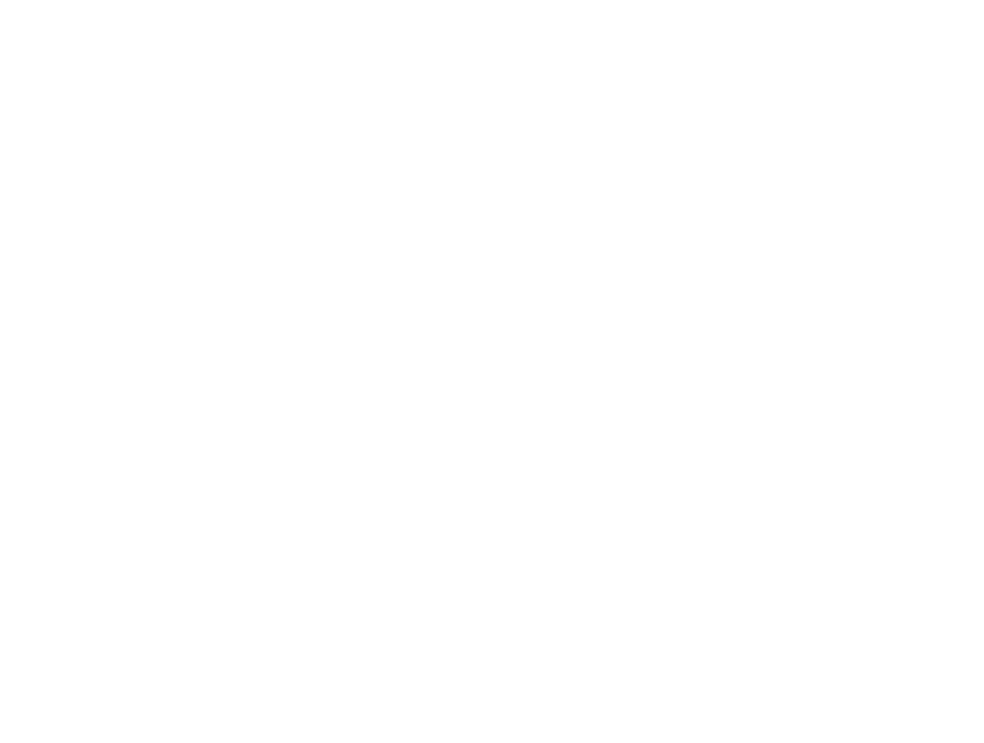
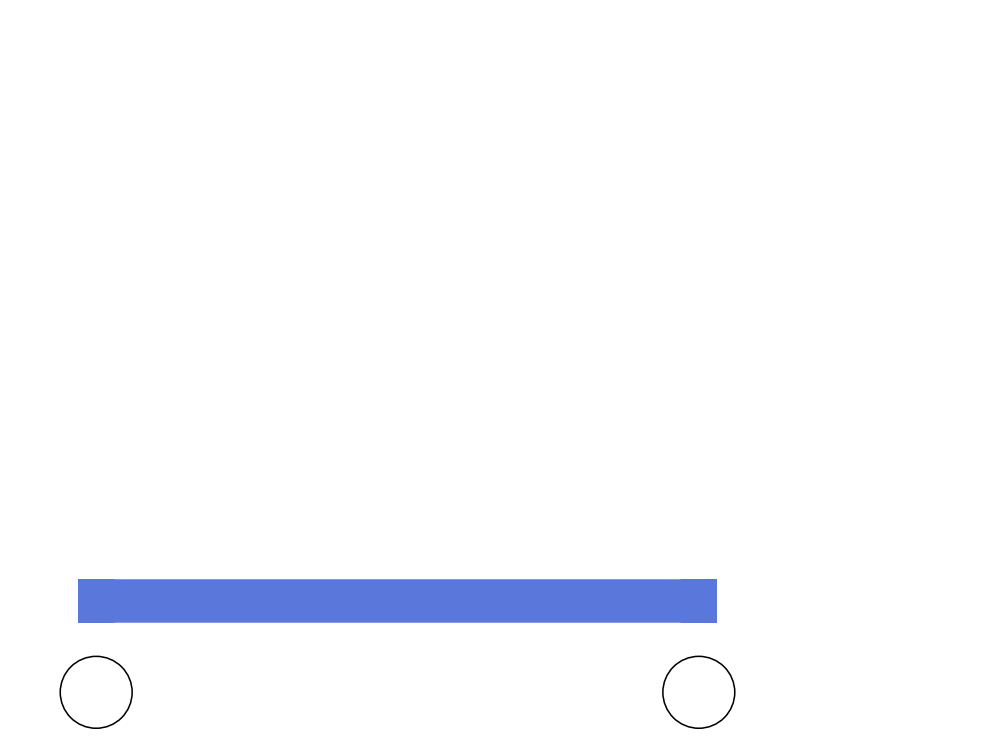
part: none -> (397, 653)

